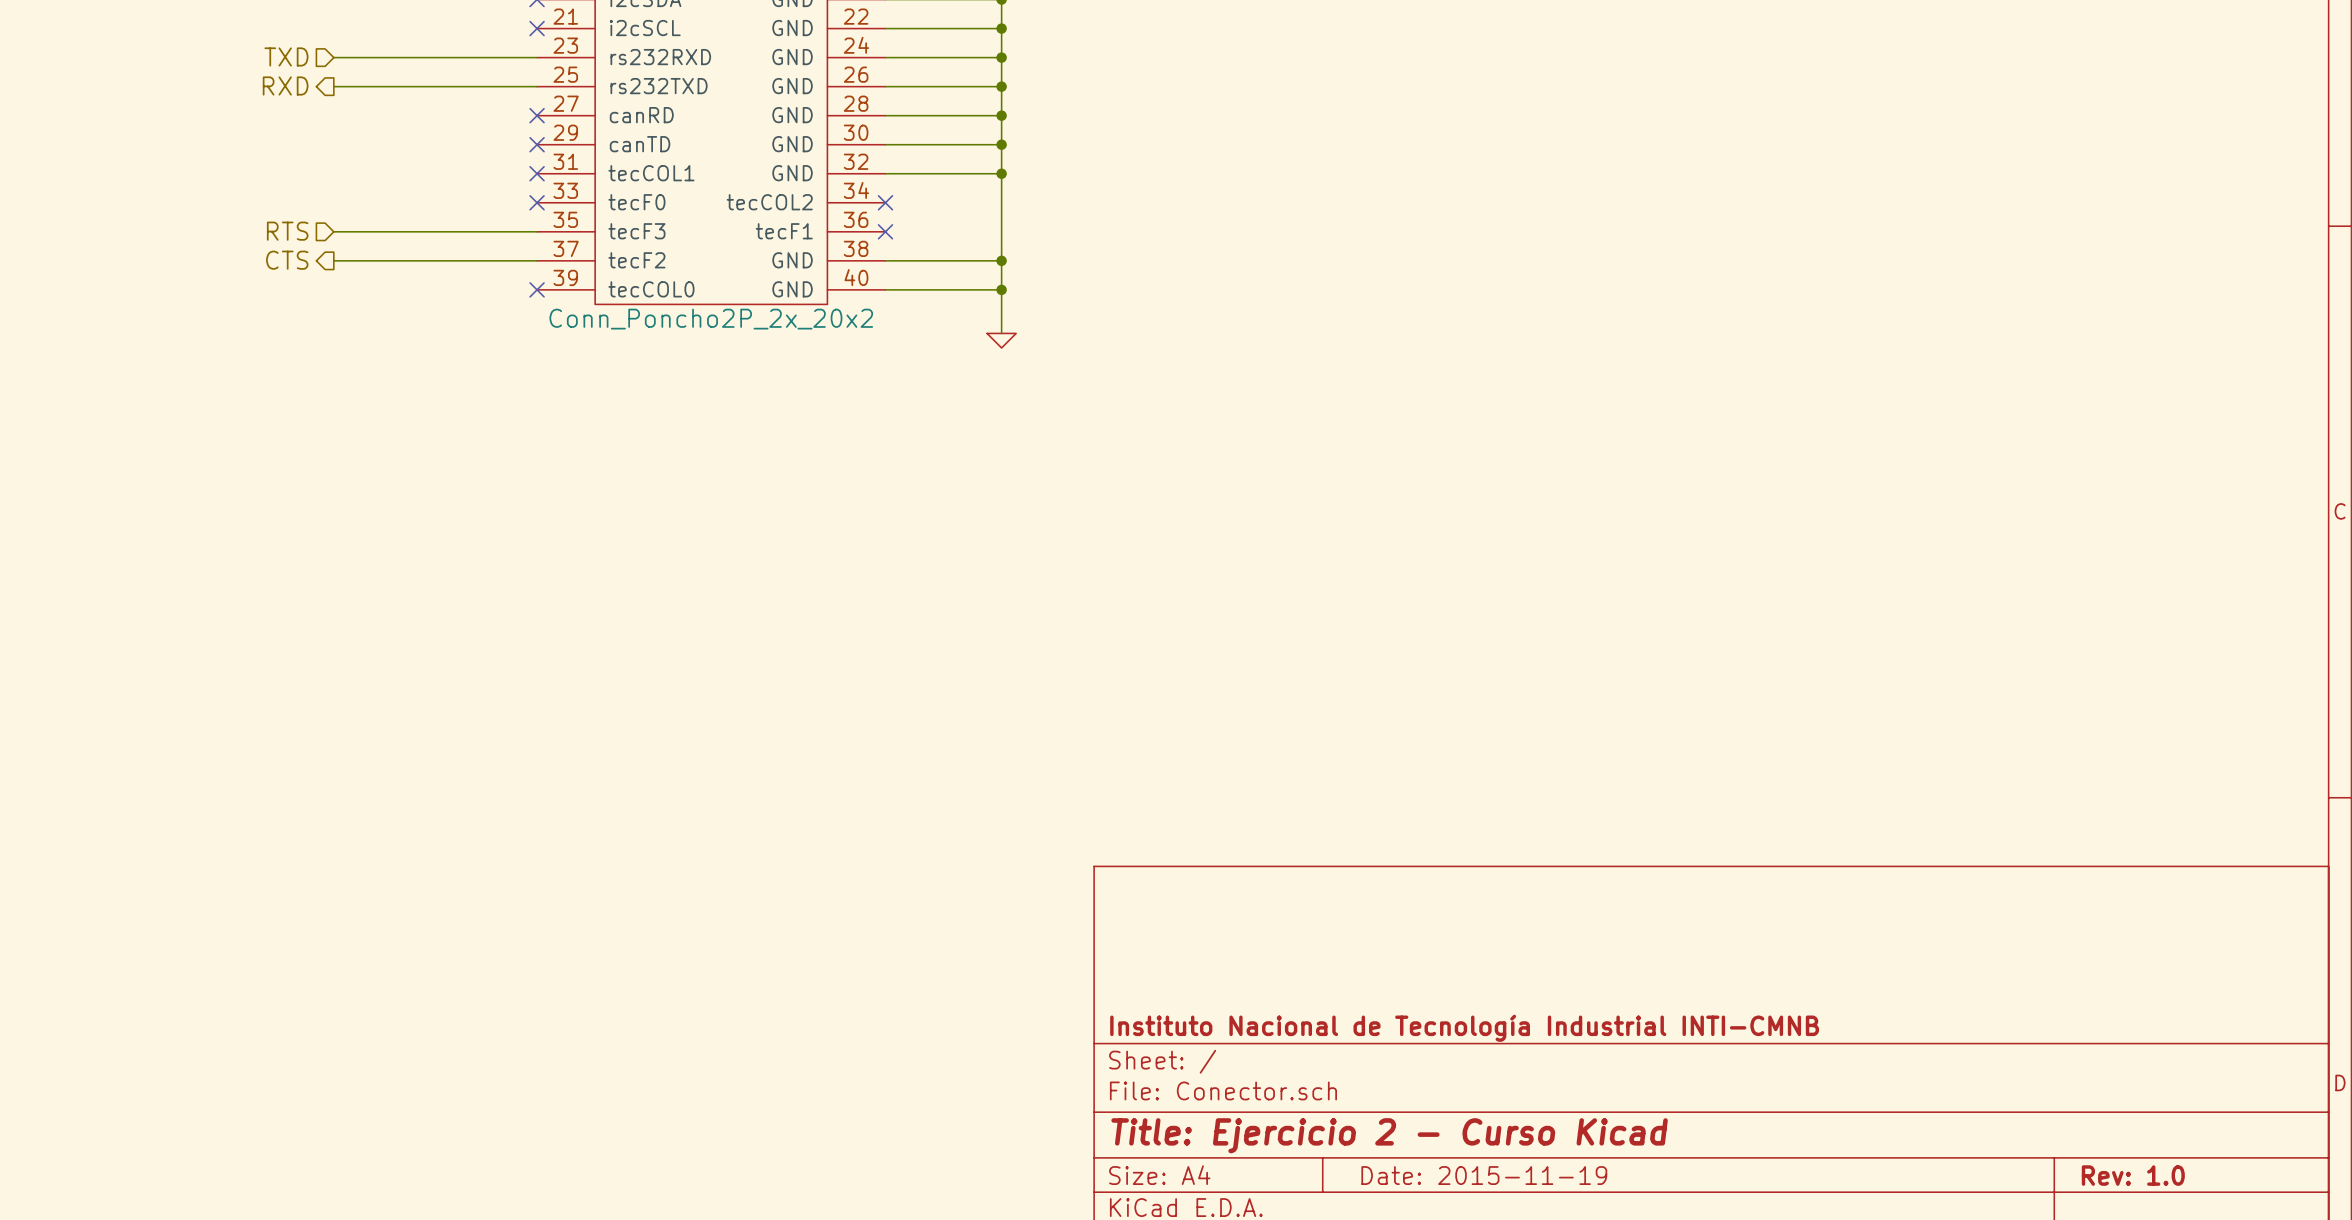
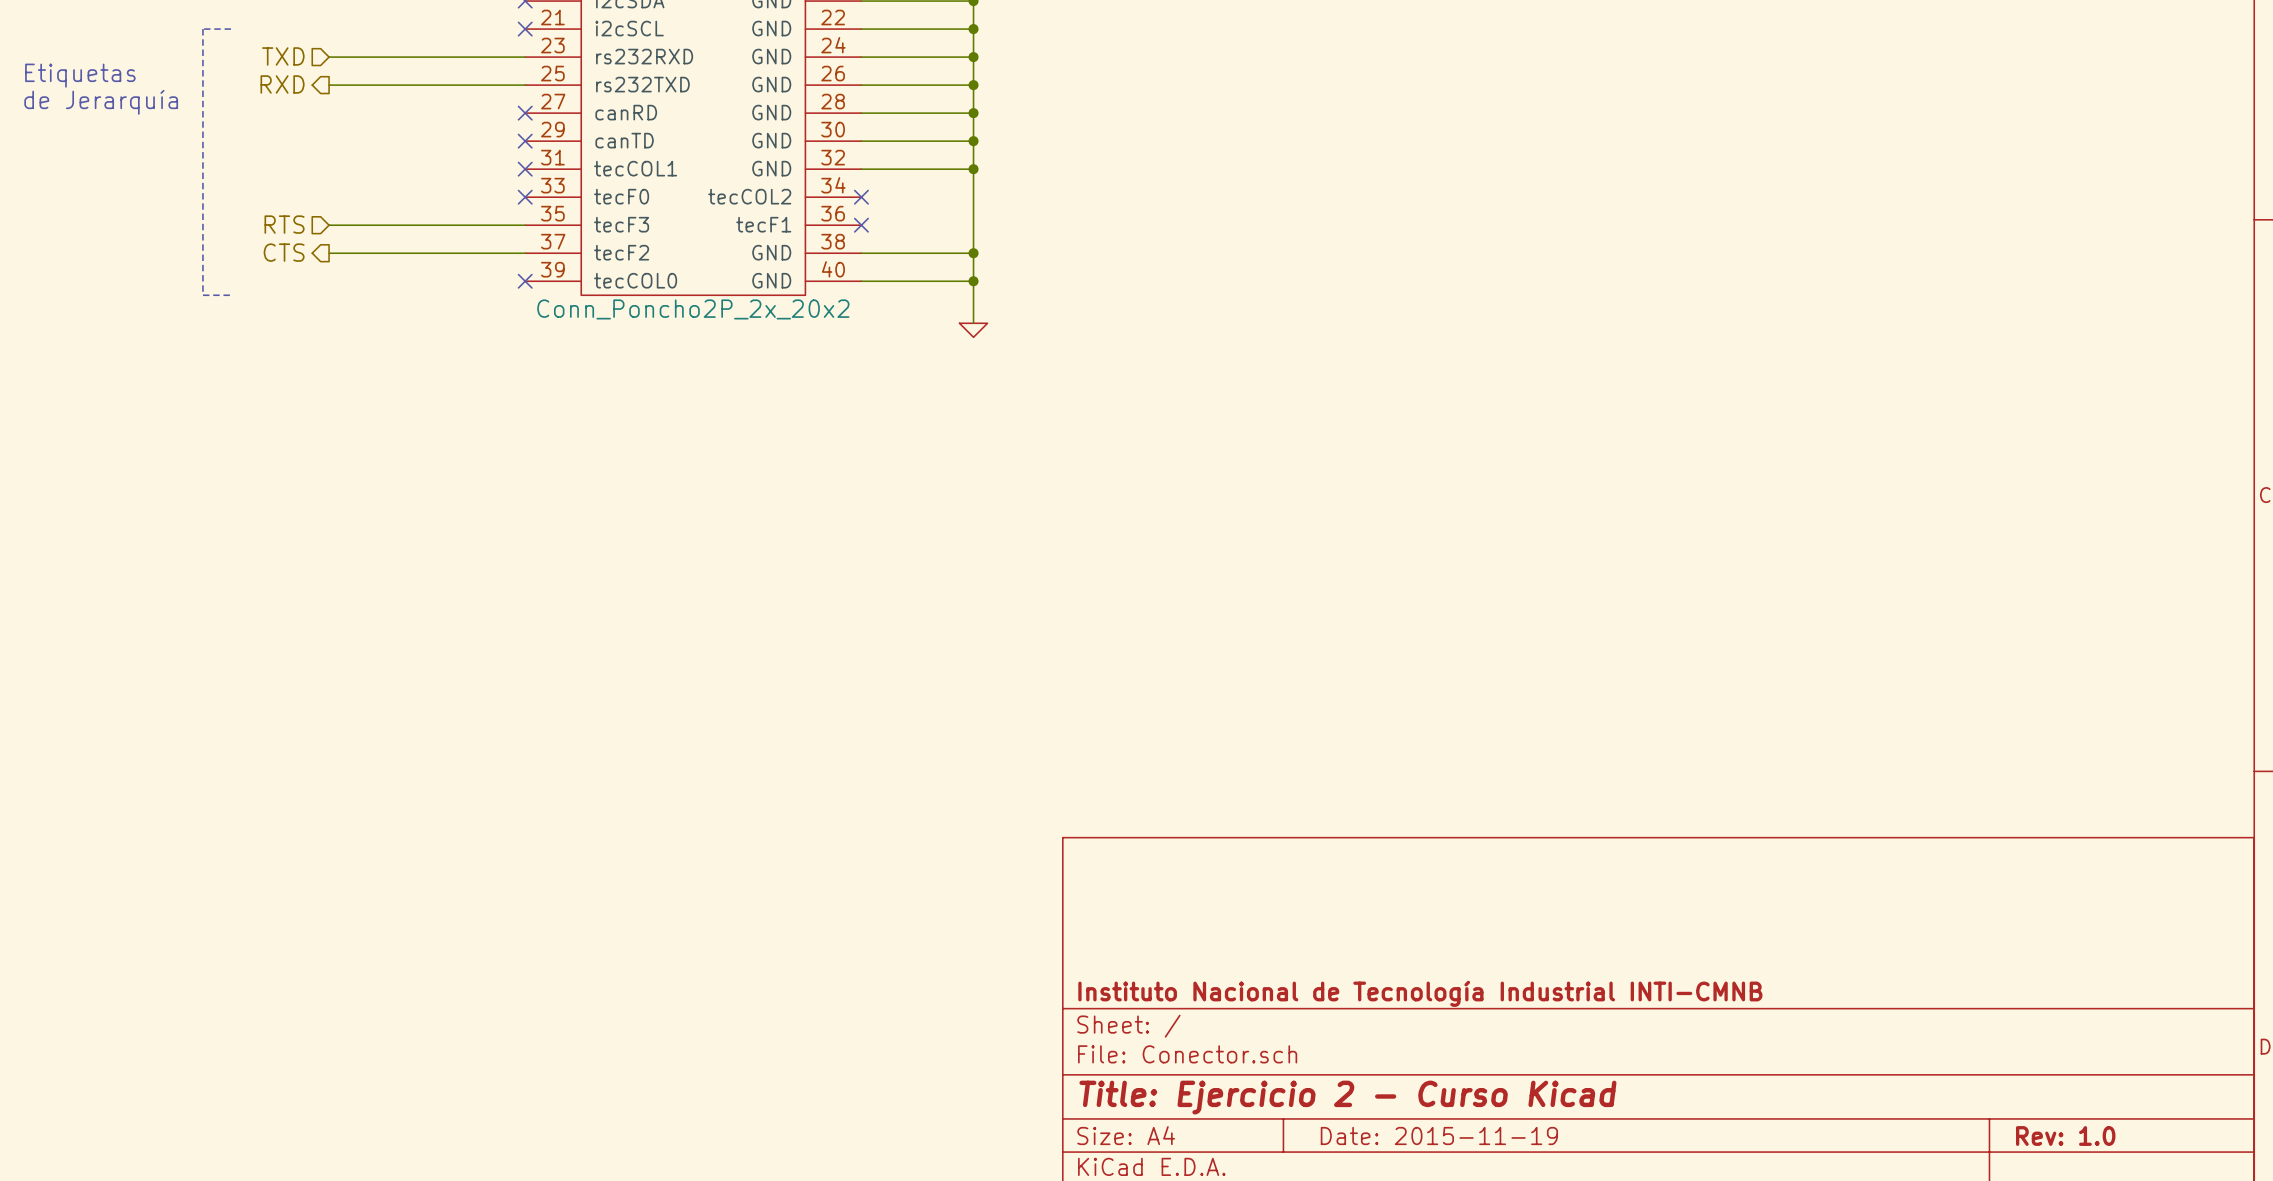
line: none -> (230, 29) (202, 29) (202, 295) (230, 295)
text: none -> Etiquetas (80, 75)
text: none -> de Jerarquía (101, 102)

